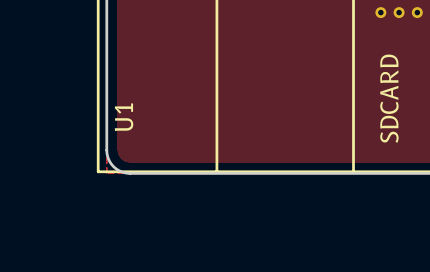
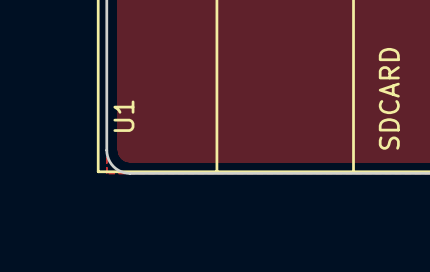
part: (380, 12) -> none
part: (399, 12) -> none
part: (417, 12) -> none

